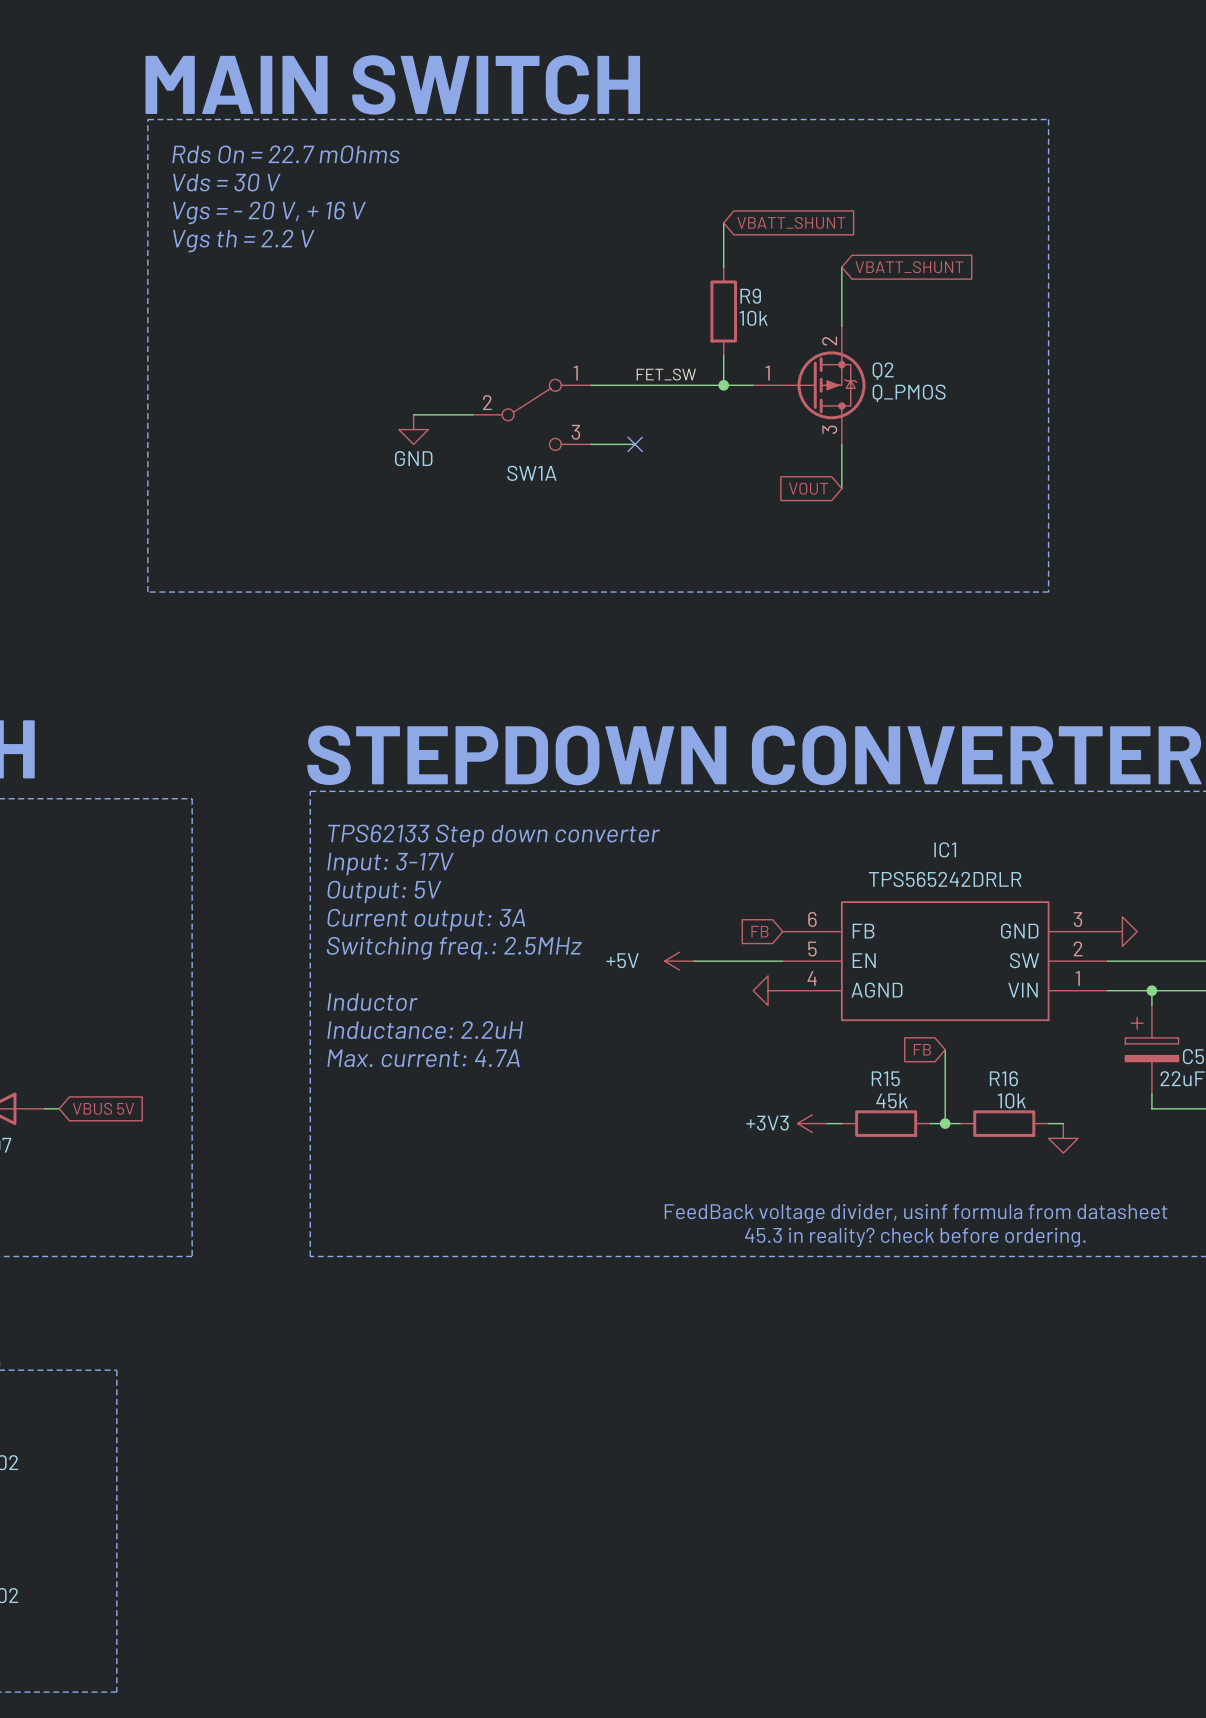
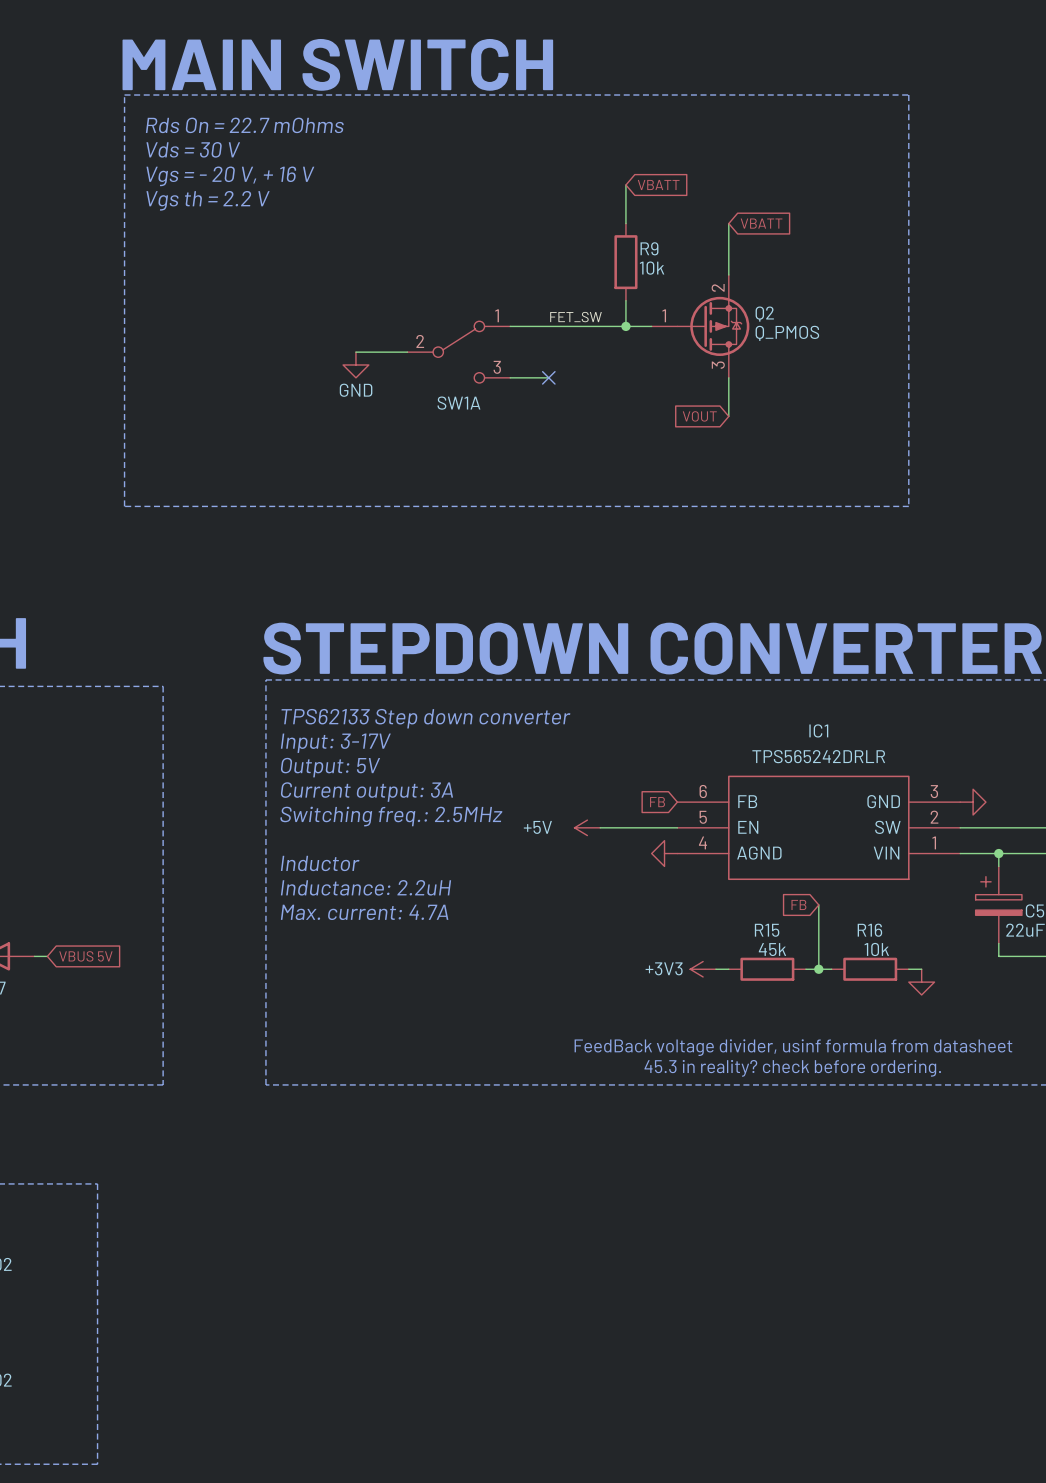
global label: VBATT_SHUNT (791, 222) -> VBATT (658, 185)
global label: VBATT_SHUNT (909, 267) -> VBATT (761, 223)

